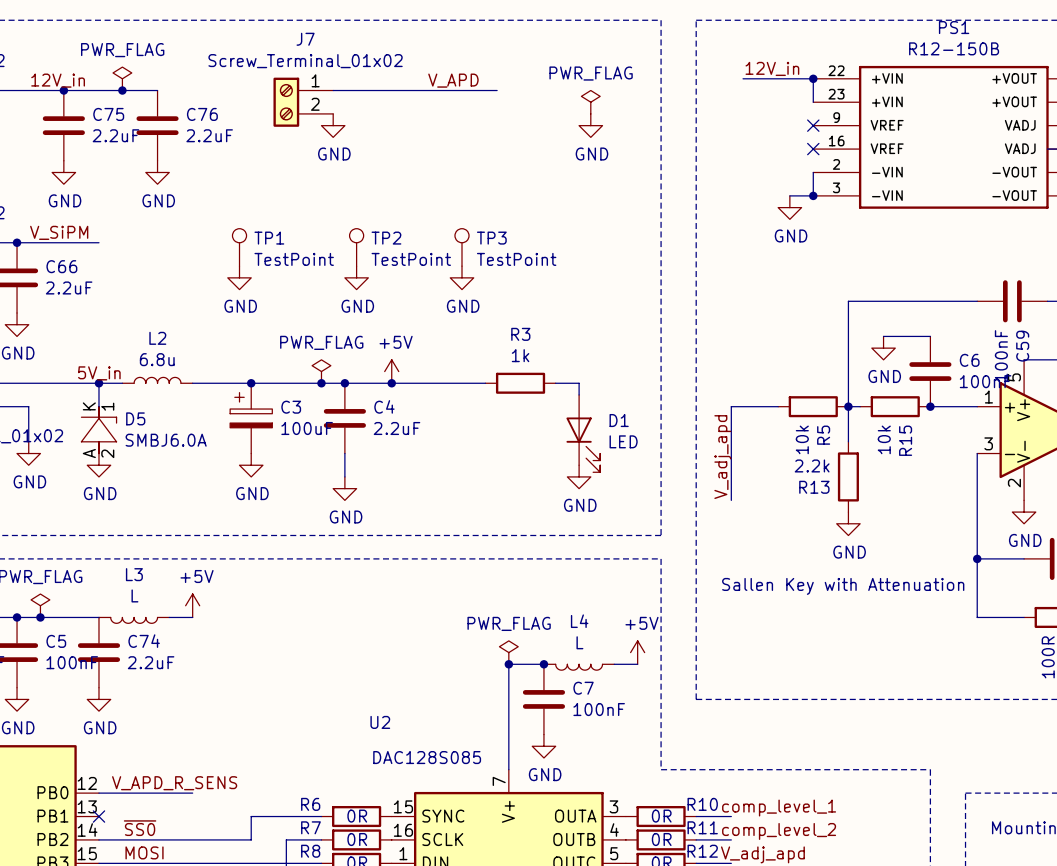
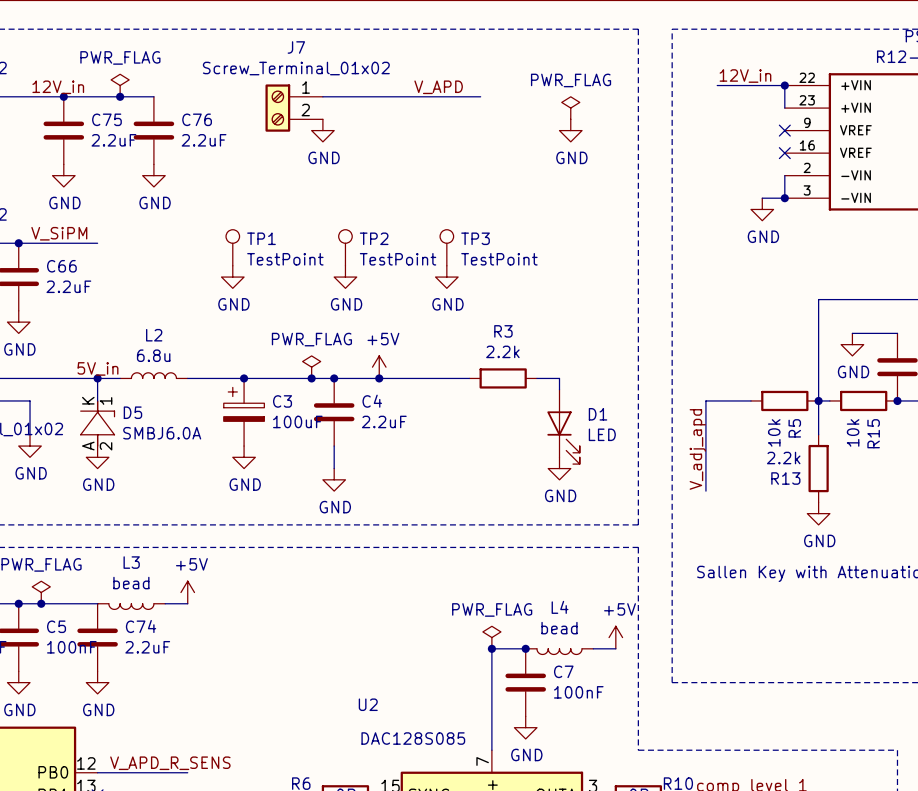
R3 value: 1k (520, 355) -> 2.2k (502, 351)
L3 value: L (134, 595) -> bead (131, 583)
L4 value: L (579, 642) -> bead (559, 628)

